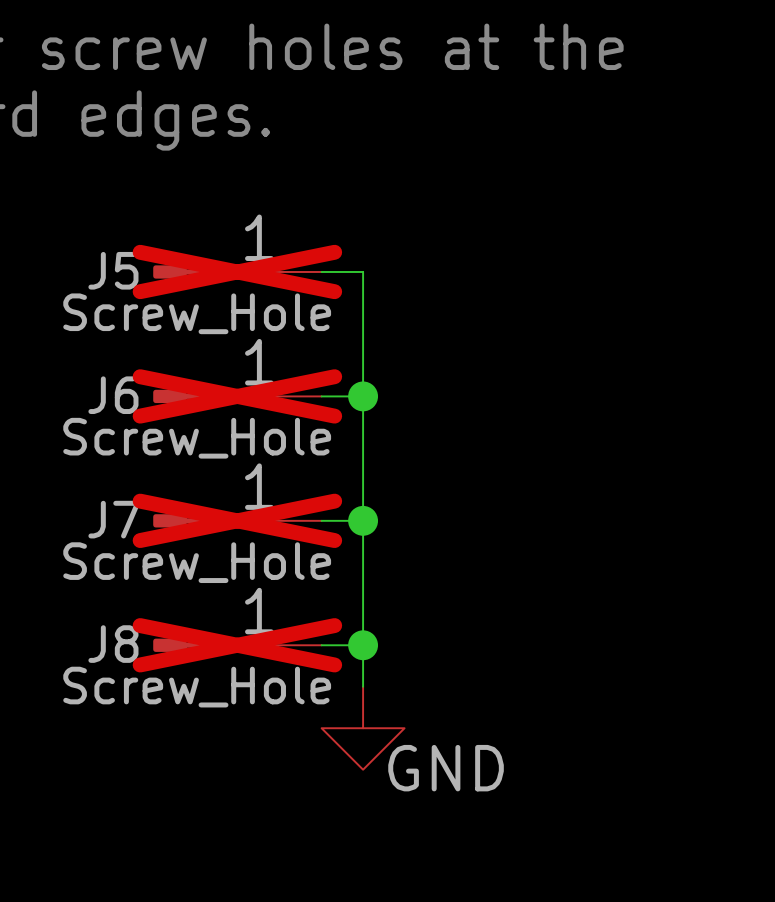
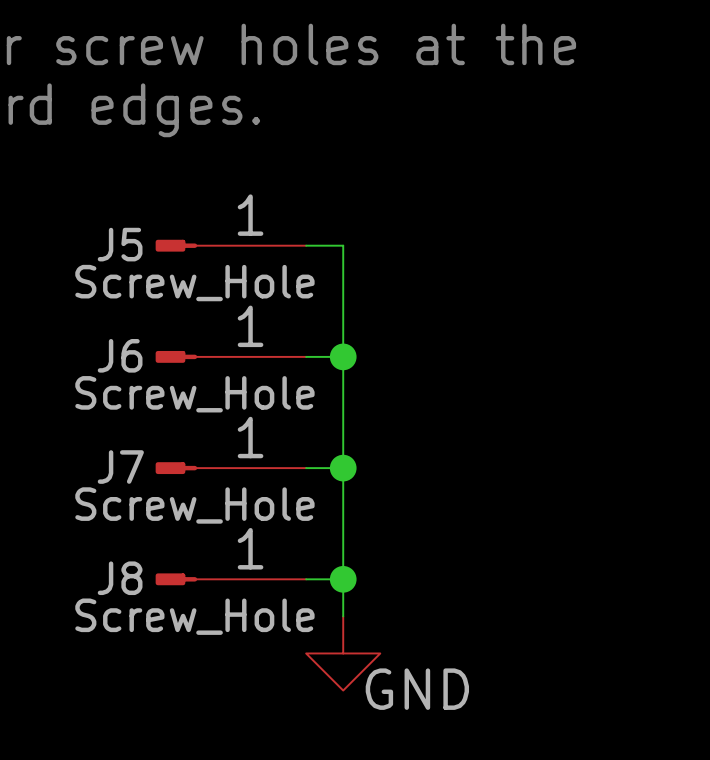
J5 do-not-place cross: (237, 271) -> none
J6 do-not-place cross: (237, 396) -> none
J7 do-not-place cross: (237, 520) -> none
J8 do-not-place cross: (237, 645) -> none

